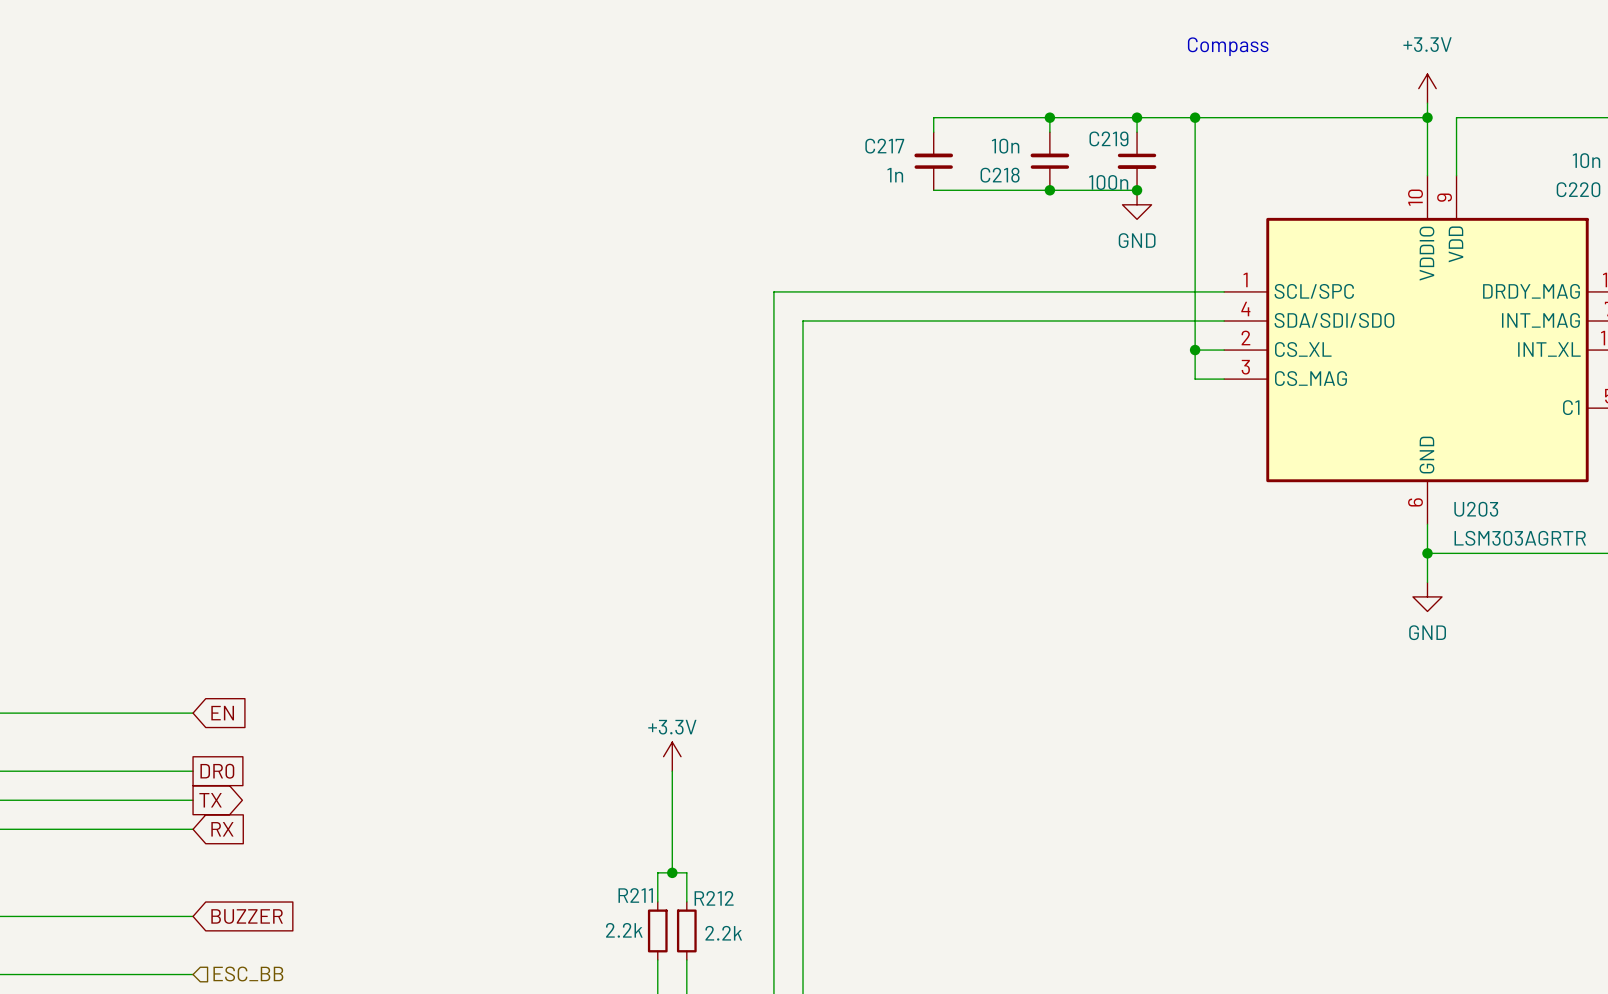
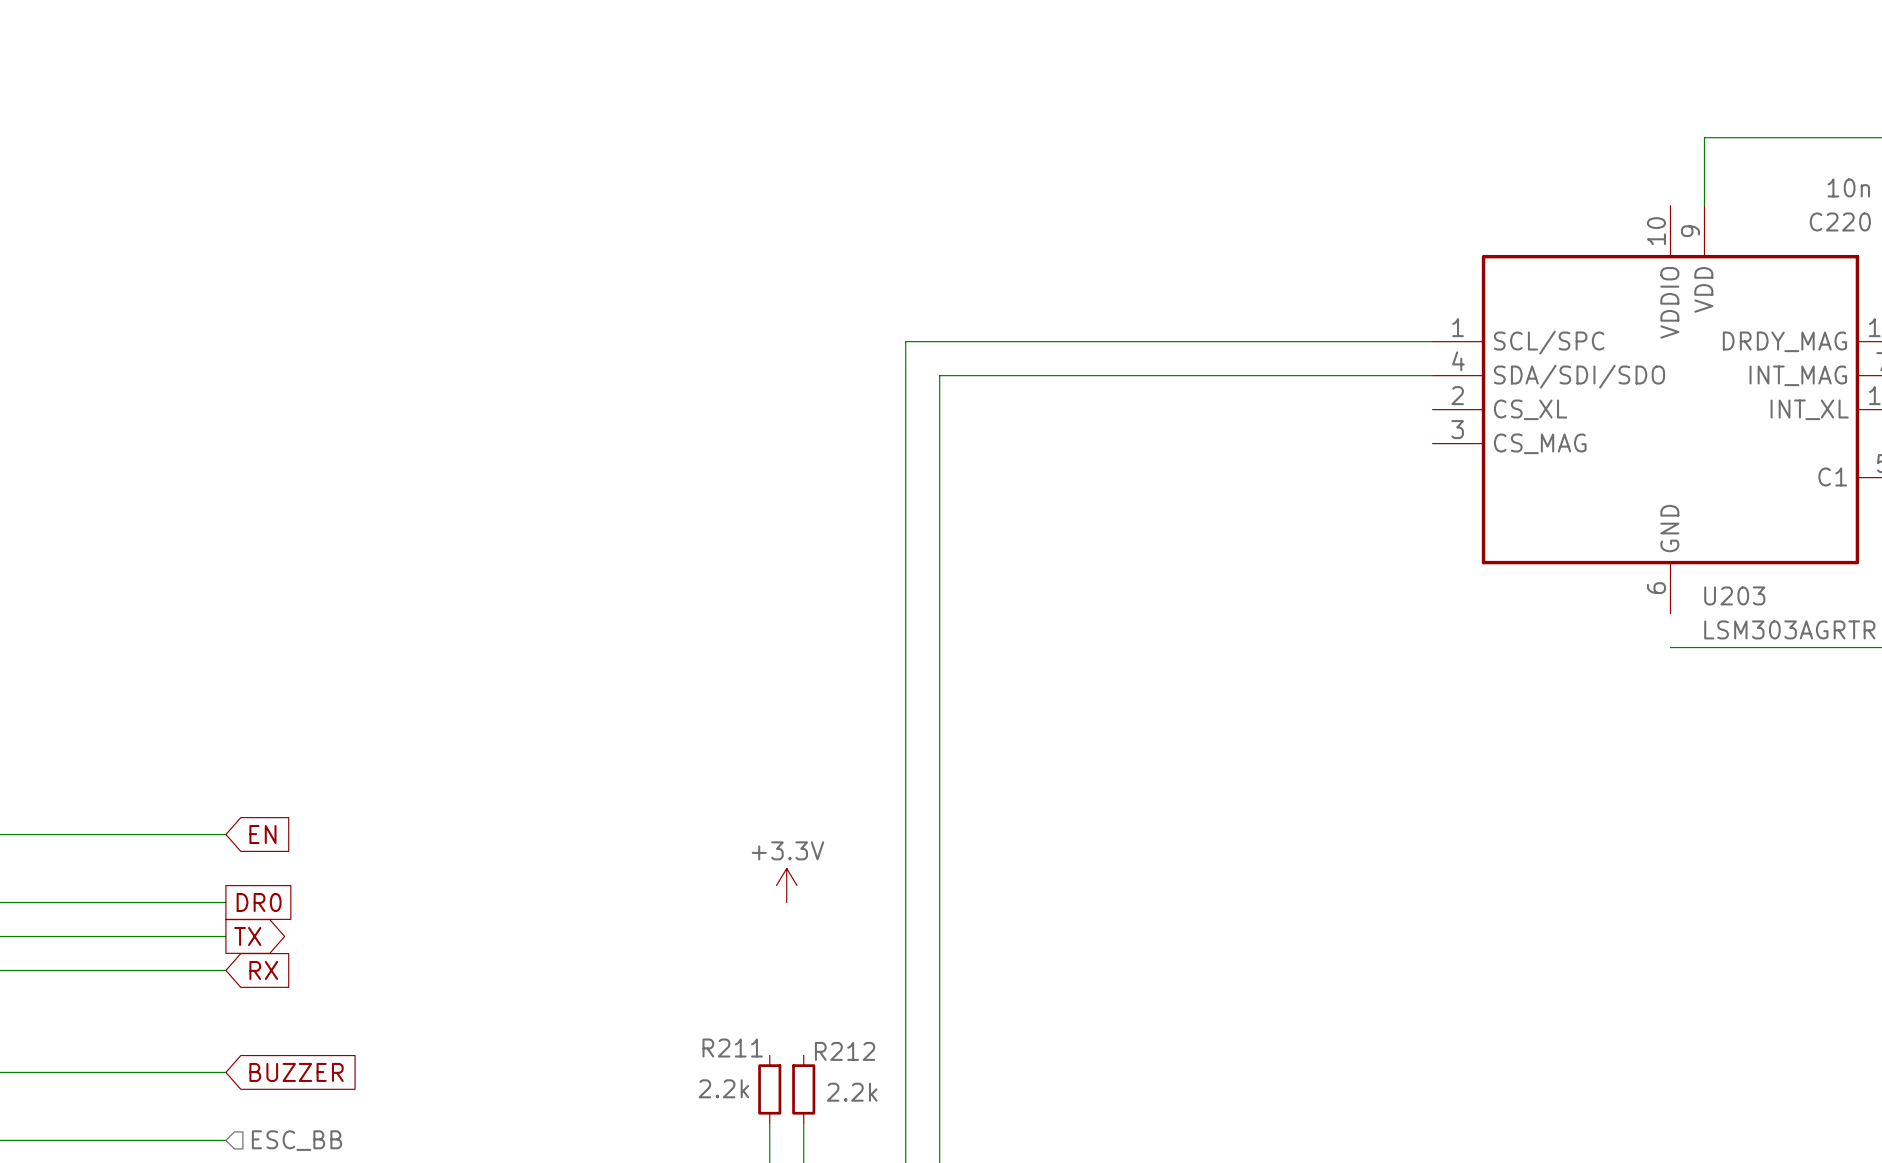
text: Compass (1228, 46) -> none
power symbol: +3.3V (1427, 88) -> none
wire: (1427, 103) (1427, 175) -> none
wire: (1049, 117) (1049, 132) -> none
junction: (1049, 117) -> none
wire: (1137, 117) (1137, 132) -> none
junction: (1137, 117) -> none
wire: (1195, 117) (1195, 379) (1224, 379) -> none
junction: (1195, 117) -> none
wire: (1427, 117) (933, 117) (933, 132) -> none
junction: (1427, 117) -> none
C217: 1n (933, 161) -> none
C218: 10n (1049, 161) -> none
C219: 100n (1137, 161) -> none
wire: (933, 190) (1137, 190) -> none
junction: (1049, 190) -> none
junction: (1137, 190) -> none
power symbol: GND (1137, 204) -> none
wire: (1195, 350) (1224, 350) -> none
junction: (1195, 350) -> none
wire: (1427, 524) (1427, 582) -> none
junction: (1427, 553) -> none
power symbol: GND (1427, 596) -> none
wire: (672, 771) (672, 872) -> none
junction: (672, 872) -> none
wire: (657, 901) (657, 872) (686, 872) (686, 901) -> none

